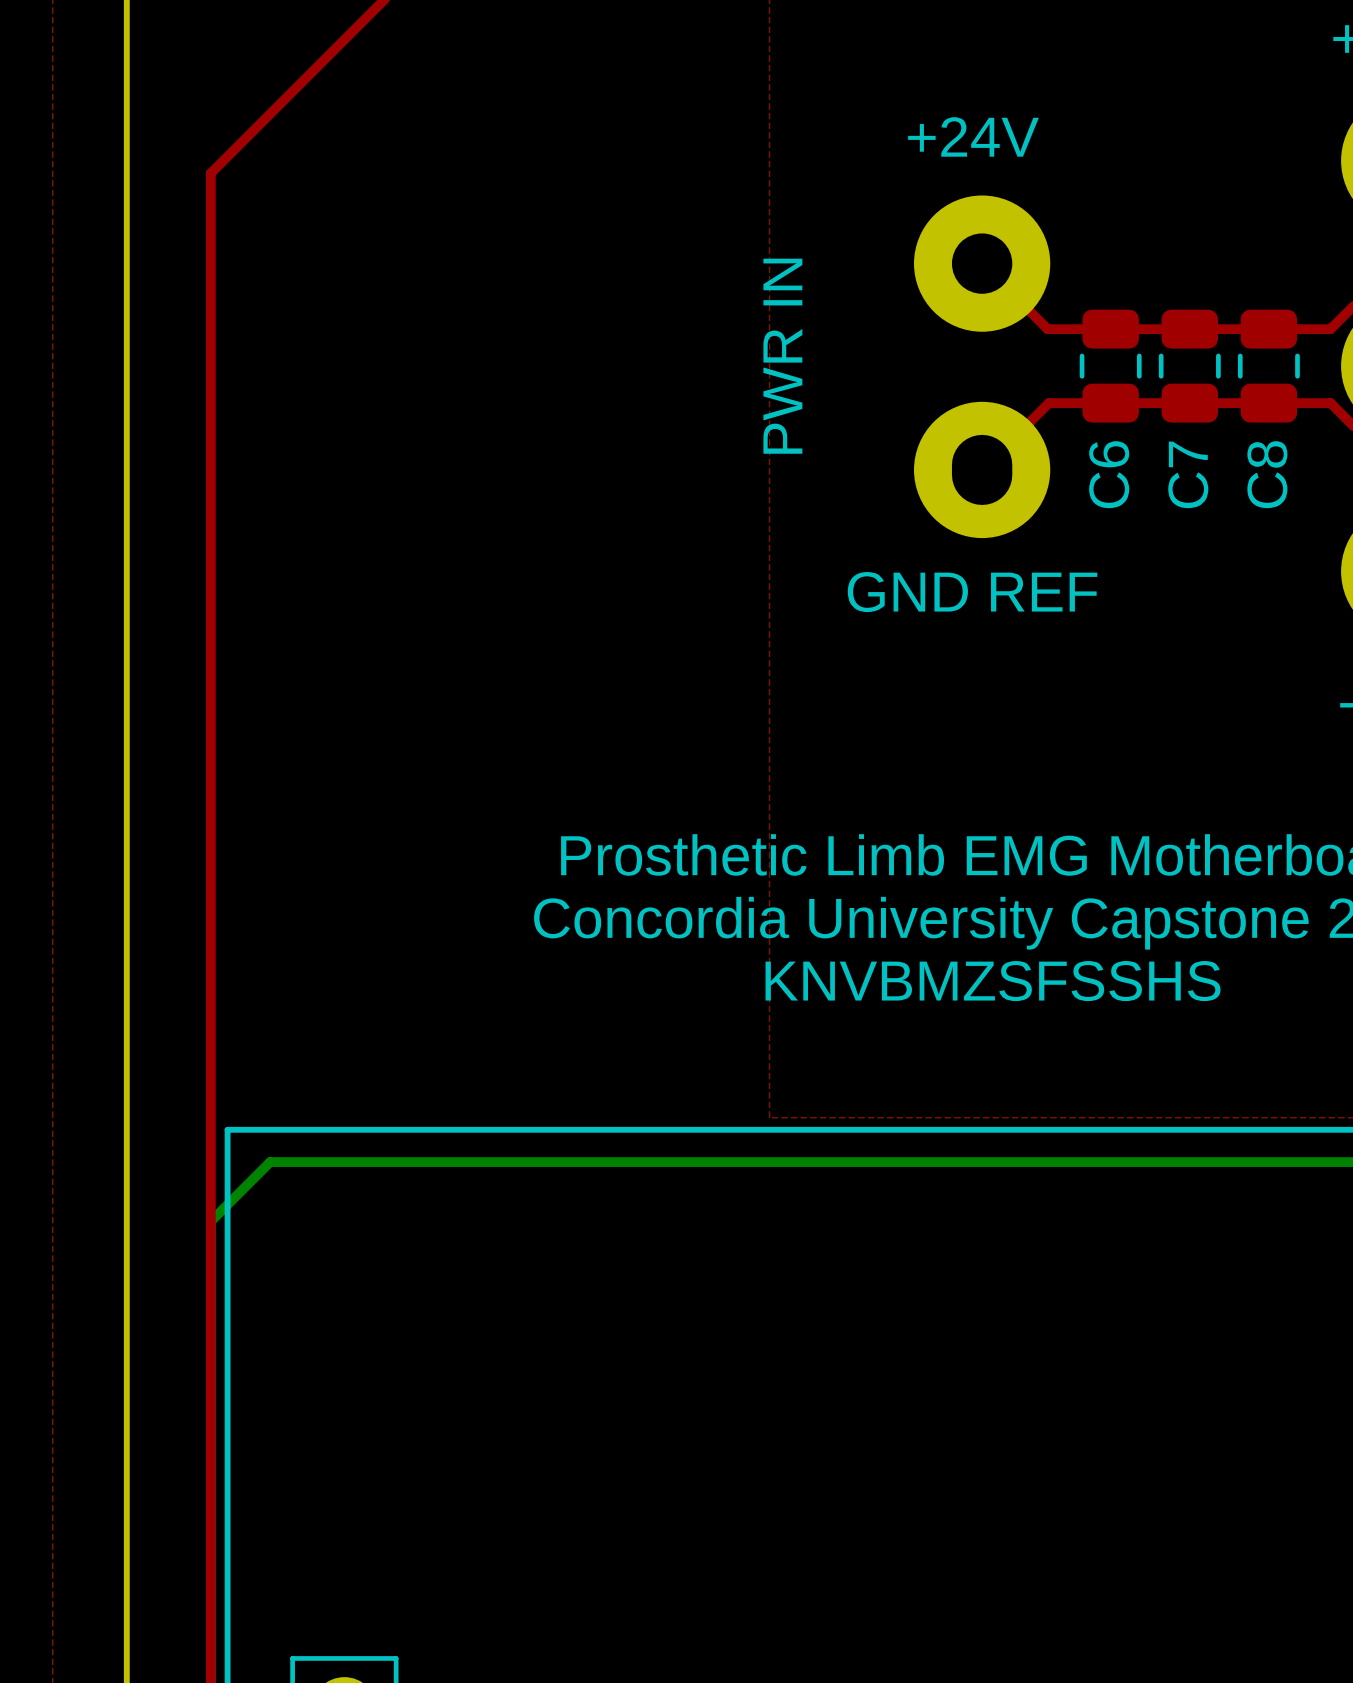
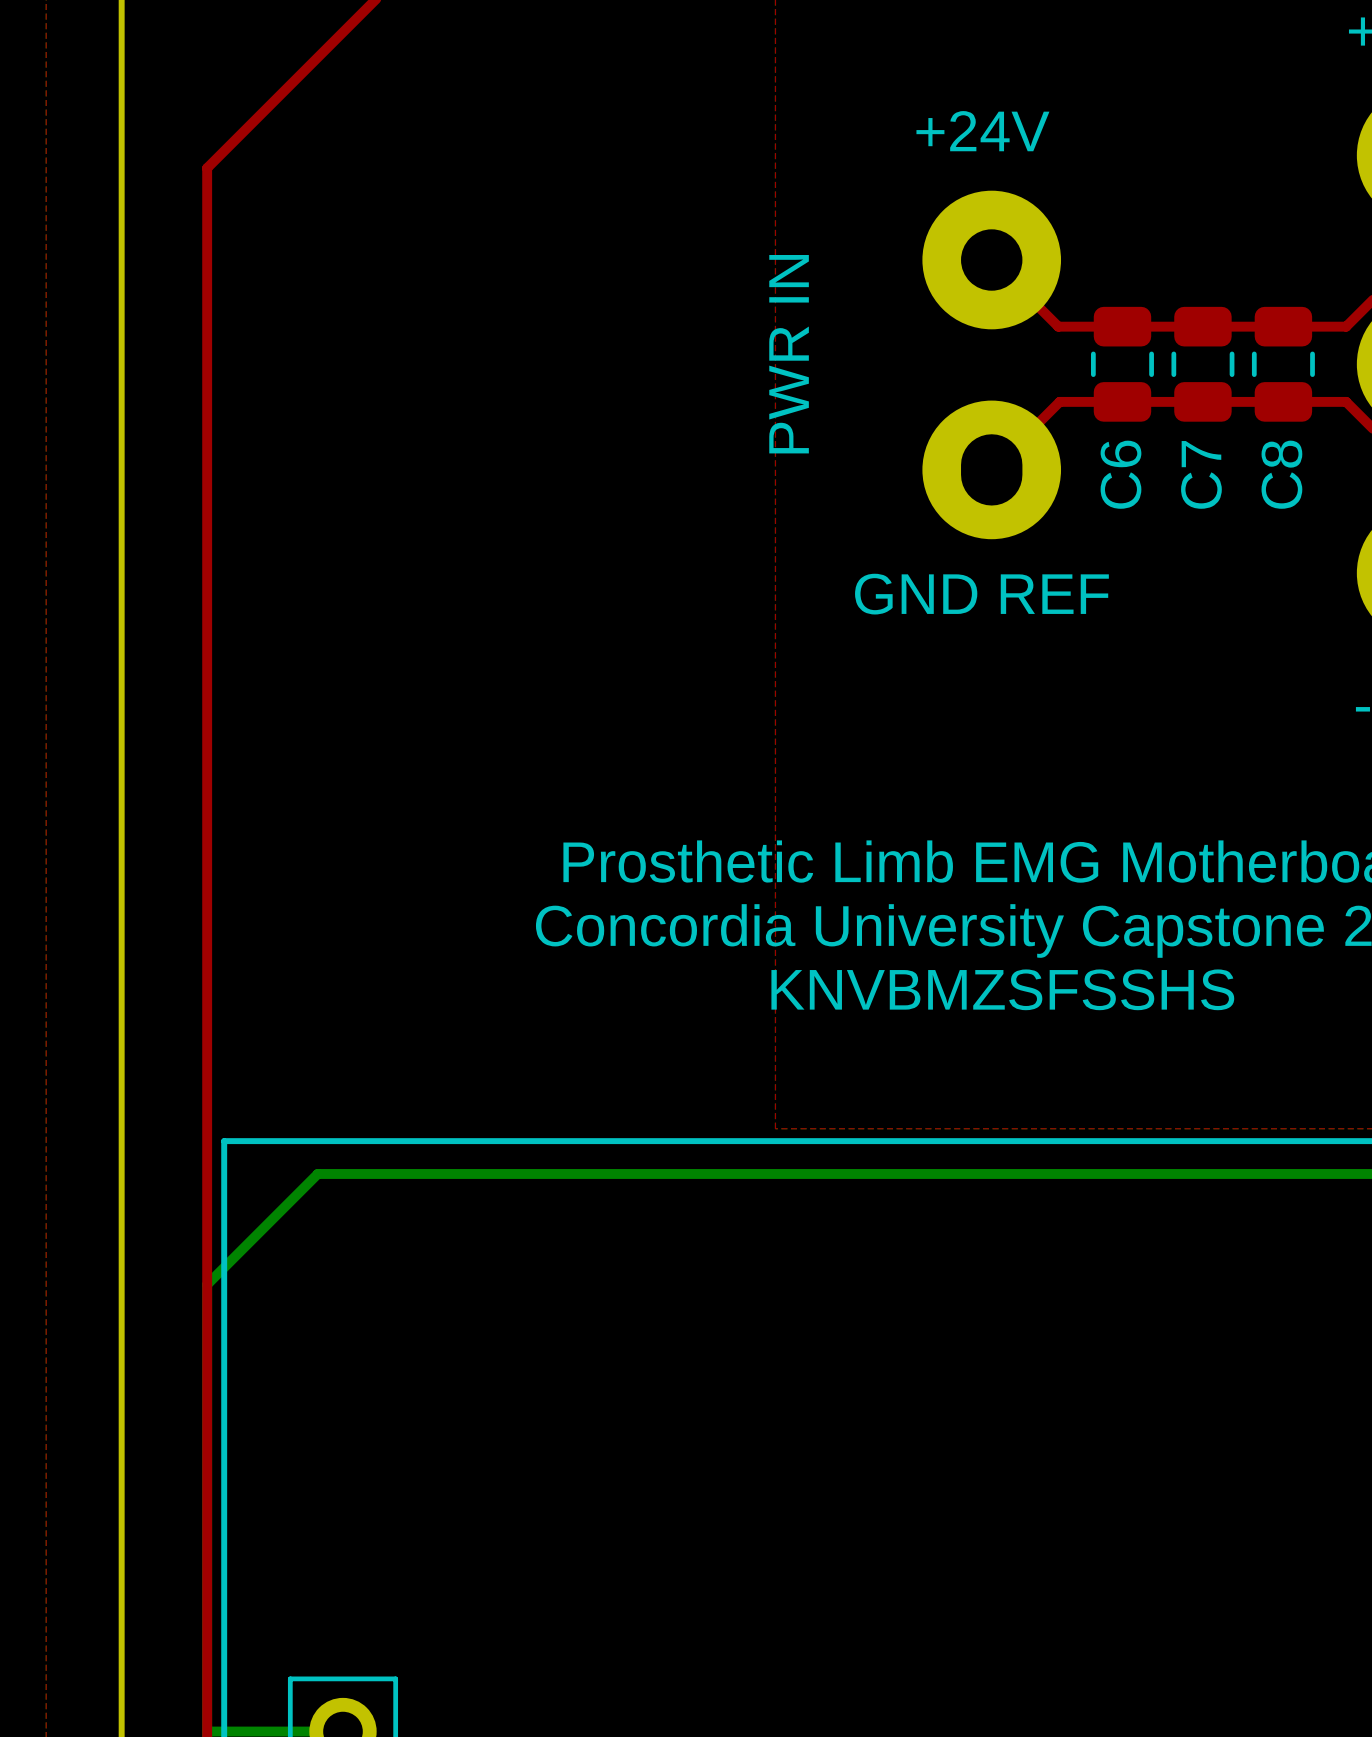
bottom track: (319, 1162) (270, 1162) (210, 1221) (210, 1270) -> (317, 1173) (207, 1284)

